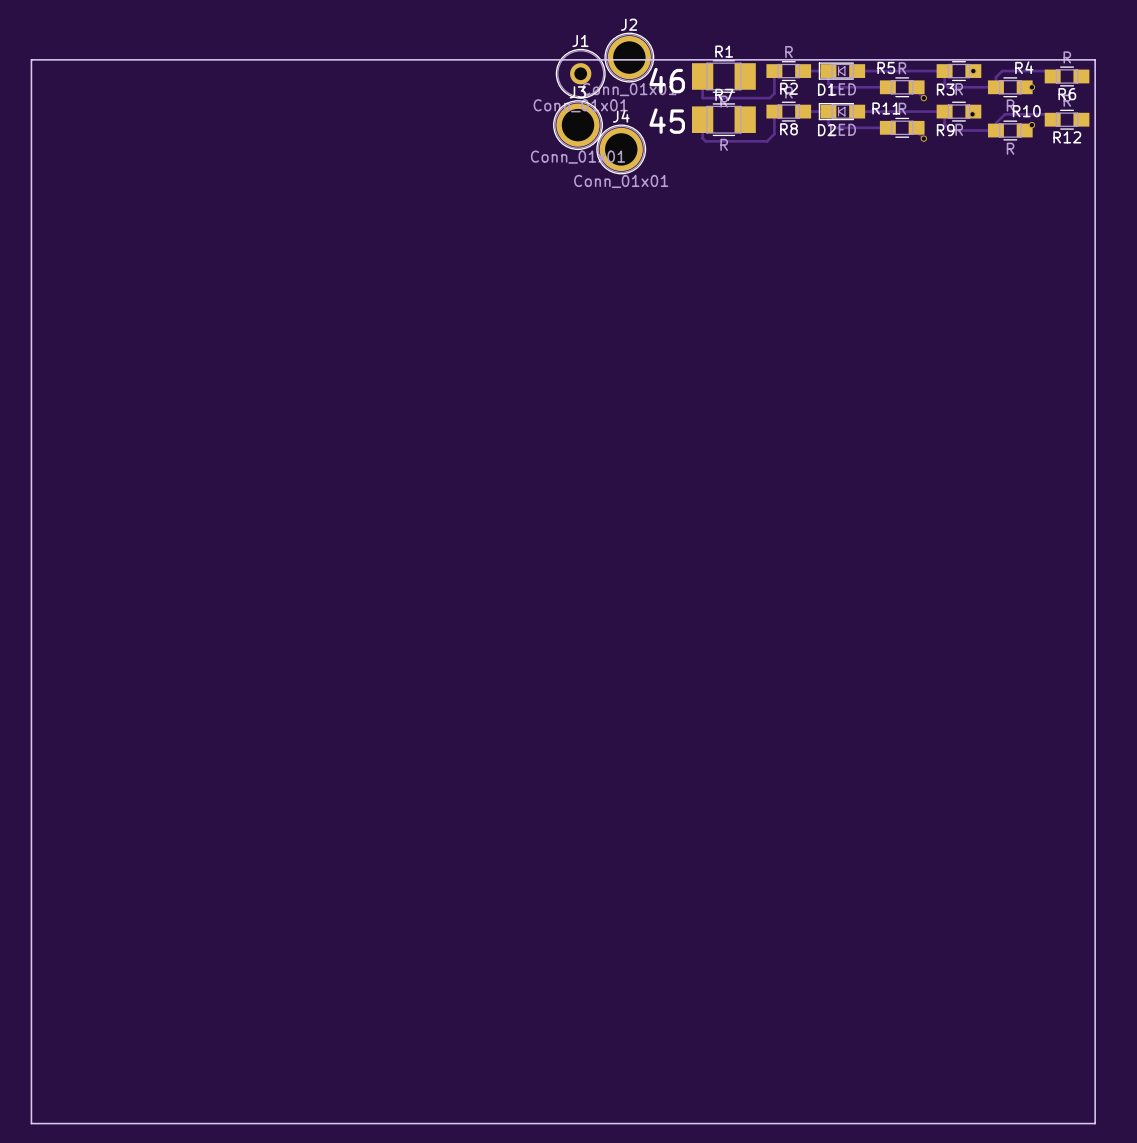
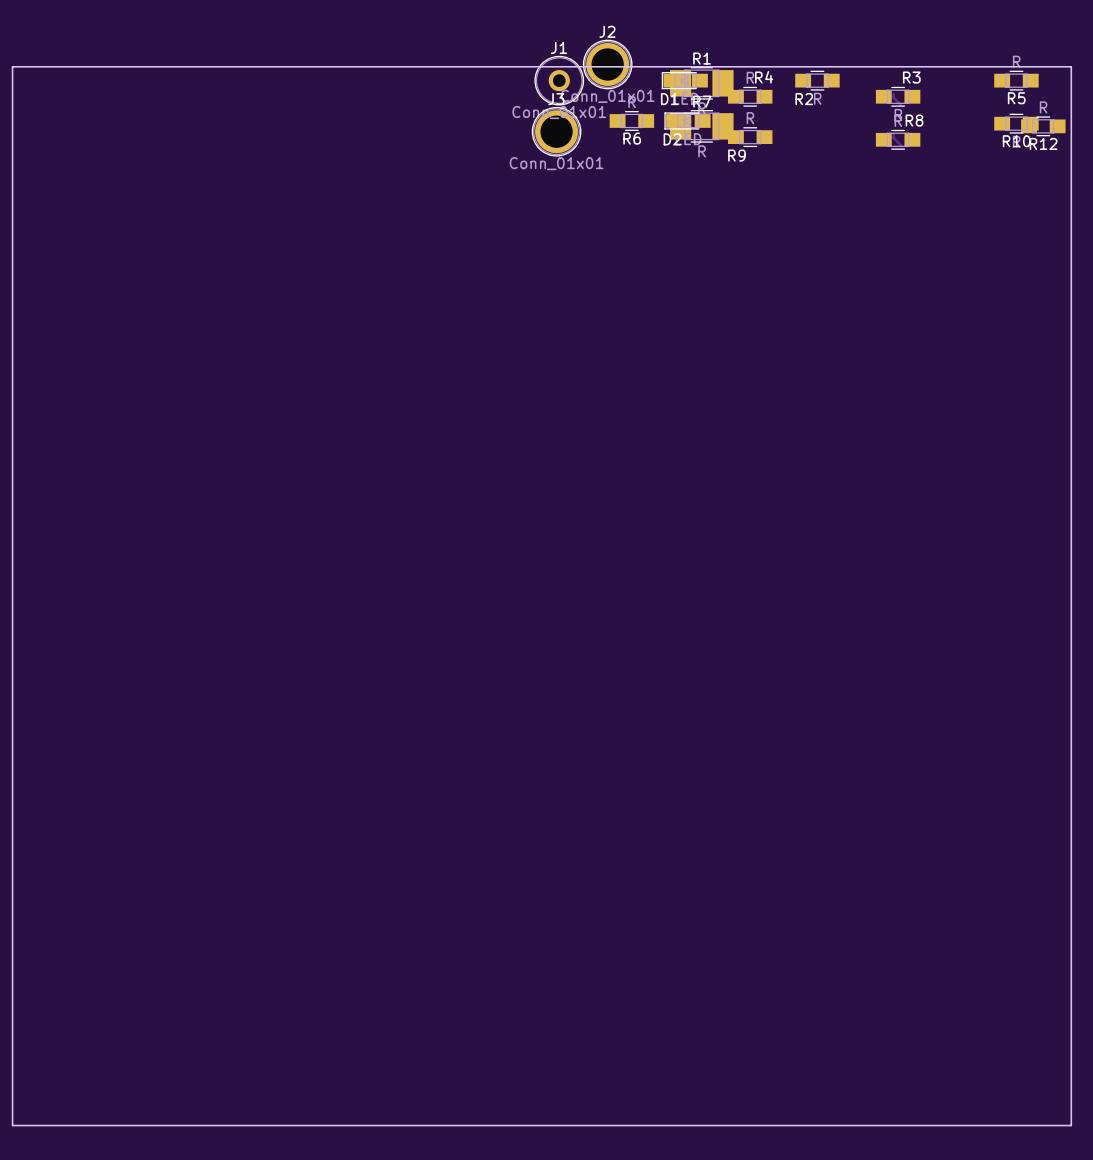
R2 value position: R (789, 52) -> R (817, 98)
R5 name position: R5 (886, 67) -> R5 (1016, 98)
track: (774, 71) (774, 93) (769, 98) (702, 98) (702, 76) -> none
R2 position: (788, 71) -> (817, 80)
track: (803, 71) (828, 71) (828, 83) (831, 87) (887, 87) -> none
D1 position: (841, 71) -> (684, 80)
track: (857, 71) (944, 71) (944, 83) (948, 87) (995, 87) (995, 77) (1002, 71) (1047, 71) (1052, 76) -> none
R3 position: (958, 71) -> (898, 96)
via: (973, 71) -> none
R6 position: (1067, 76) -> (631, 120)
text: 46 (667, 80) -> none
R5 position: (902, 87) -> (1016, 80)
R4 position: (1010, 87) -> (750, 96)
via: (1031, 87) -> none
R2 name position: R2 (789, 88) -> R2 (804, 99)
R3 name position: R3 (945, 89) -> R3 (911, 77)
via: (923, 98) -> none
R4 value position: R (1010, 105) -> R (750, 77)
track: (774, 111) (774, 134) (767, 141) (705, 141) (702, 138) (702, 119) -> none
R8 position: (788, 111) -> (898, 139)
track: (803, 111) (828, 111) (828, 124) (831, 127) (887, 127) -> none
D2 position: (841, 111) -> (687, 120)
track: (857, 111) (944, 111) (944, 124) (950, 130) (995, 130) (995, 123) (1004, 114) (1047, 114) (1052, 119) -> none
R9 position: (958, 111) -> (750, 137)
R10 name position: R10 (1026, 111) -> R10 (1016, 141)
via: (972, 114) -> none
text: 45 (667, 121) -> none
via: (1031, 125) -> none
R11: R (902, 127) -> none
R8 name position: R8 (789, 129) -> R8 (914, 120)
R9 value position: R (959, 129) -> R (750, 118)
R10 position: (1010, 130) -> (1016, 123)
via: (923, 138) -> none
J4: Conn_01x01 (621, 149) -> none

